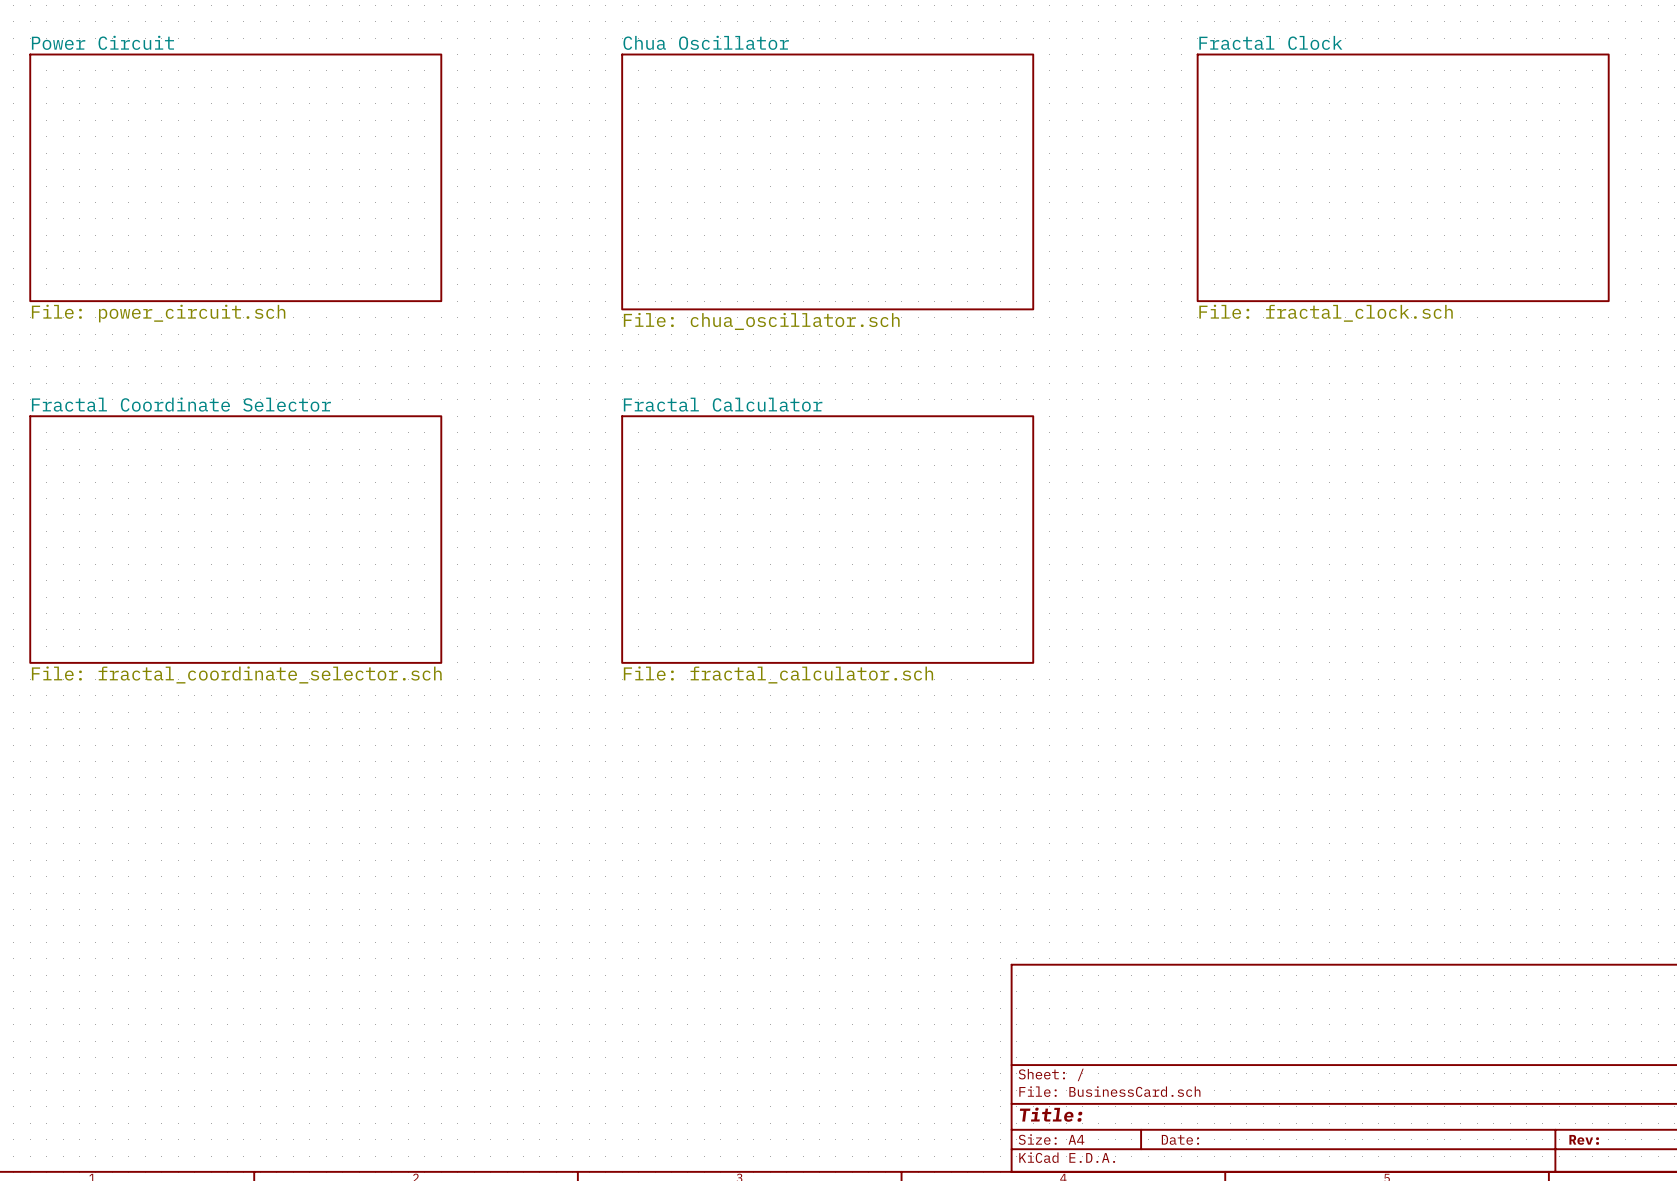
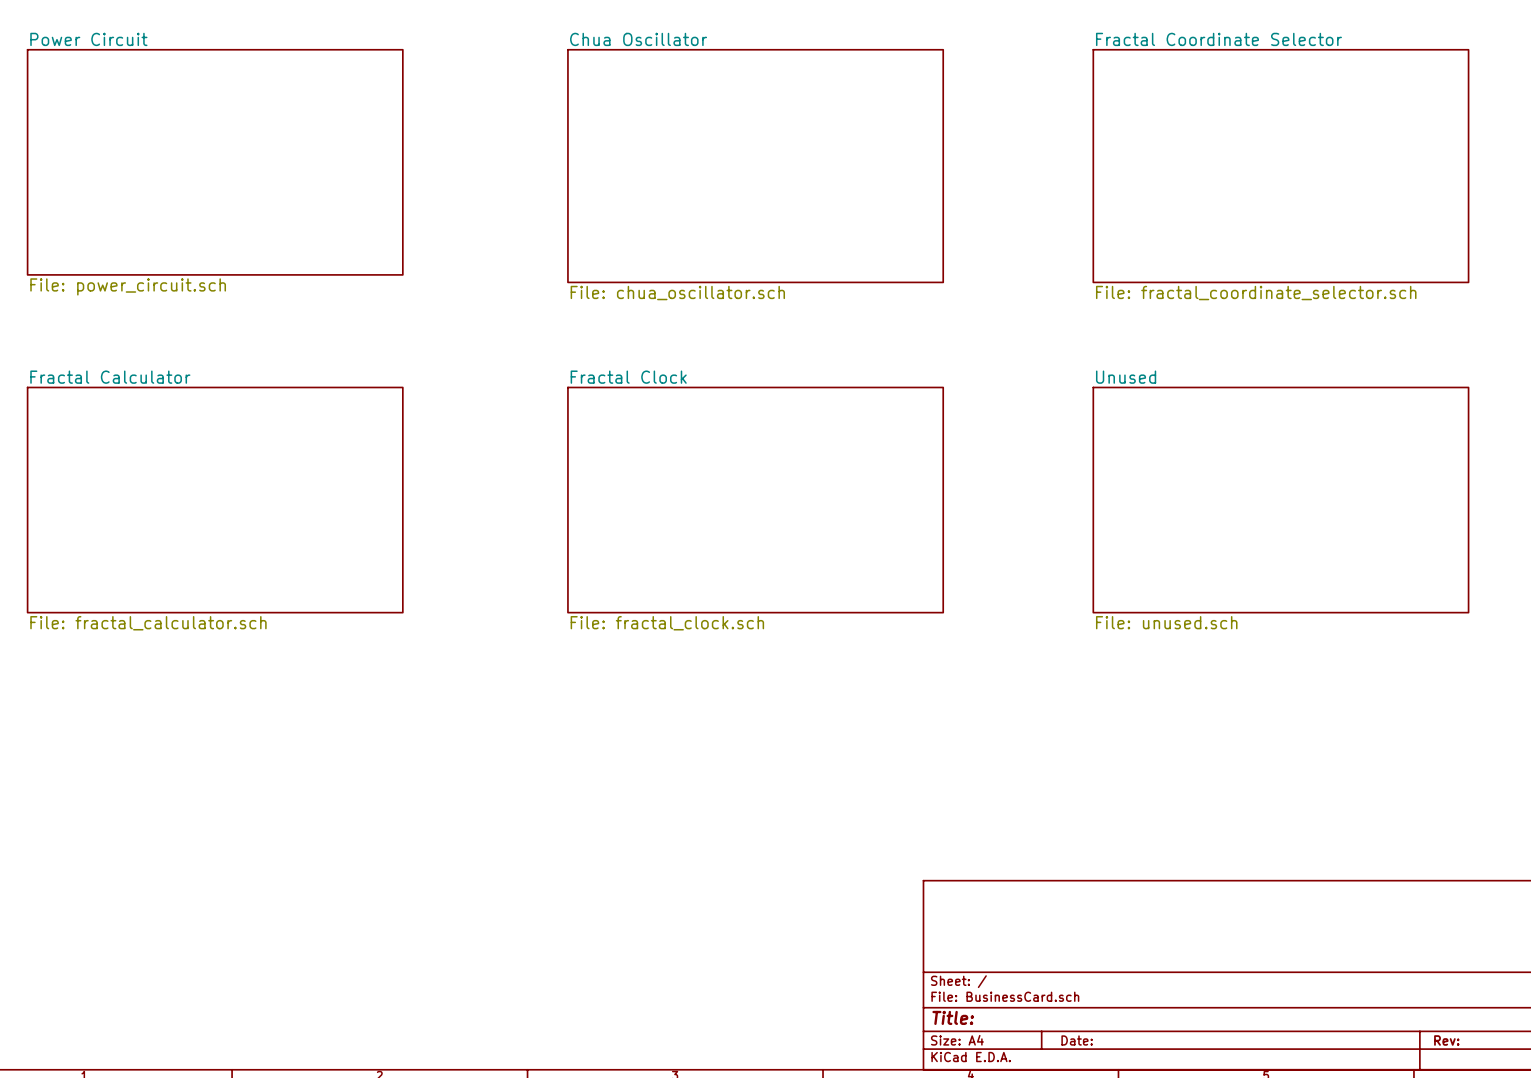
sheet Fractal Clock: File: fractal_clock.sch (1403, 177) -> none
sheet Fractal Coordinate Selector: none -> File: fractal_coordinate_selector.sch (1280, 166)
sheet Fractal Coordinate Selector: File: fractal_coordinate_selector.sch (235, 539) -> none
sheet Fractal Calculator: File: fractal_calculator.sch (827, 539) -> none
sheet Fractal Calculator: none -> File: fractal_calculator.sch (215, 500)
sheet Fractal Clock: none -> File: fractal_clock.sch (755, 500)
sheet Unused: none -> File: unused.sch (1280, 500)

